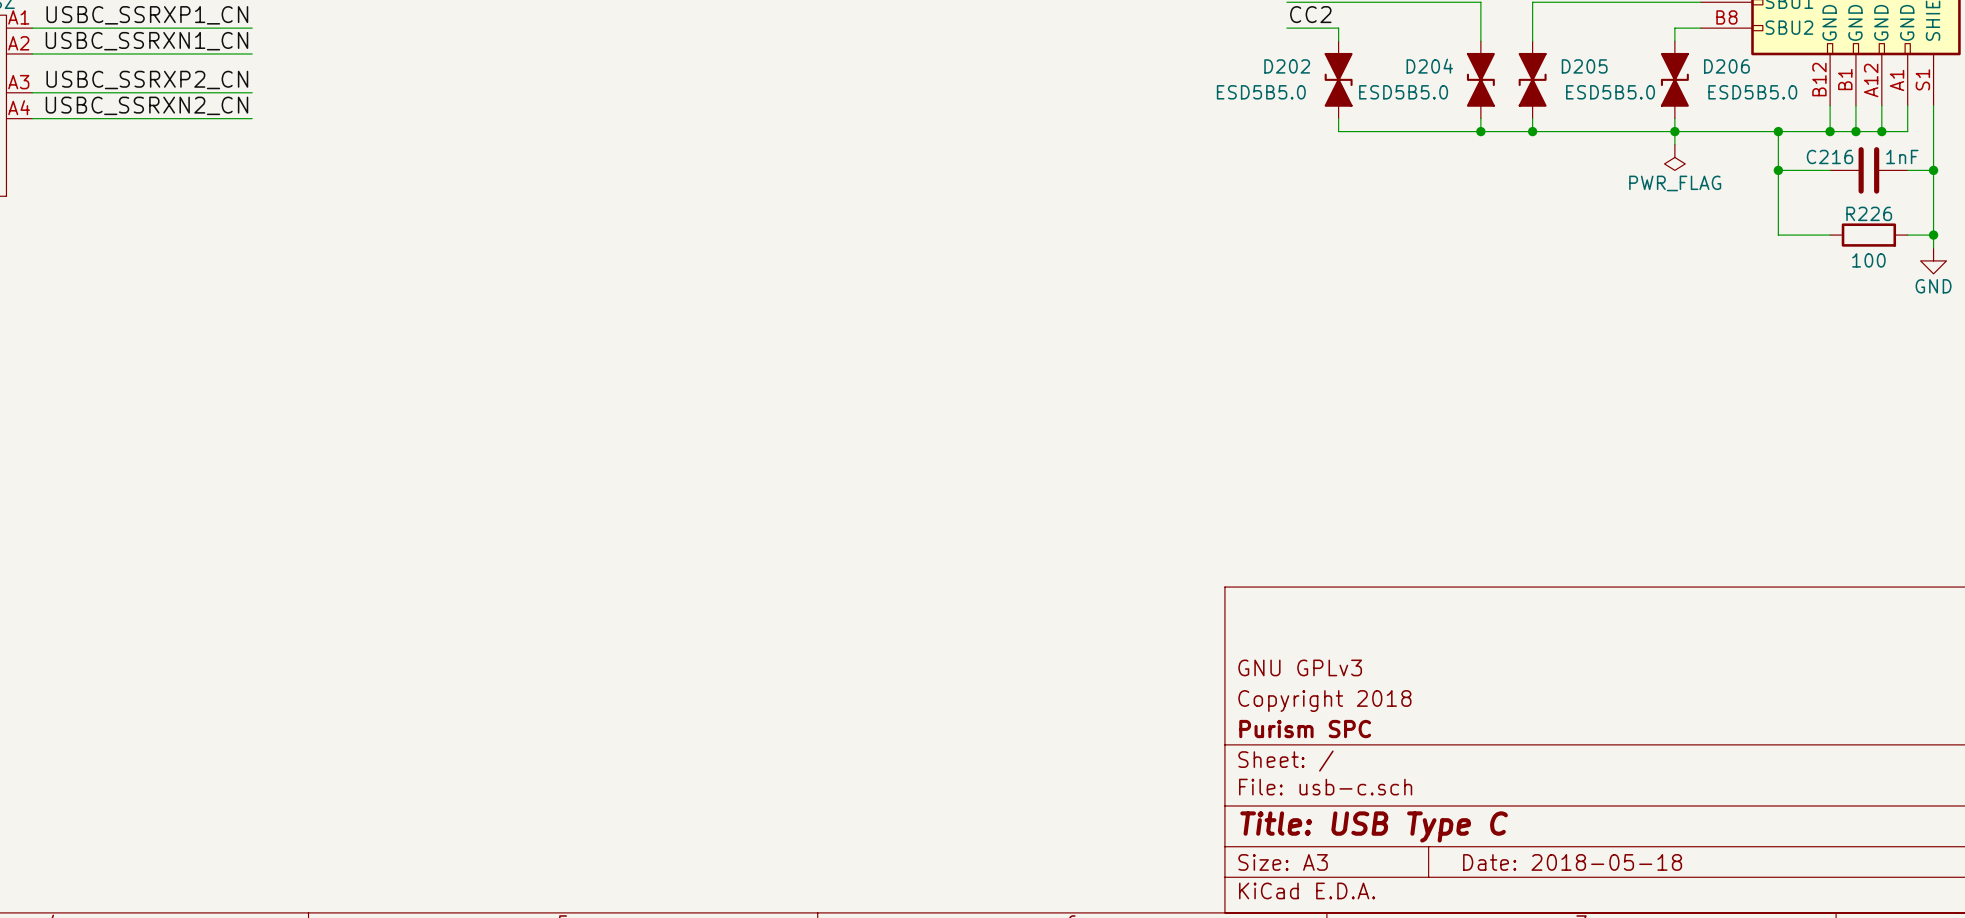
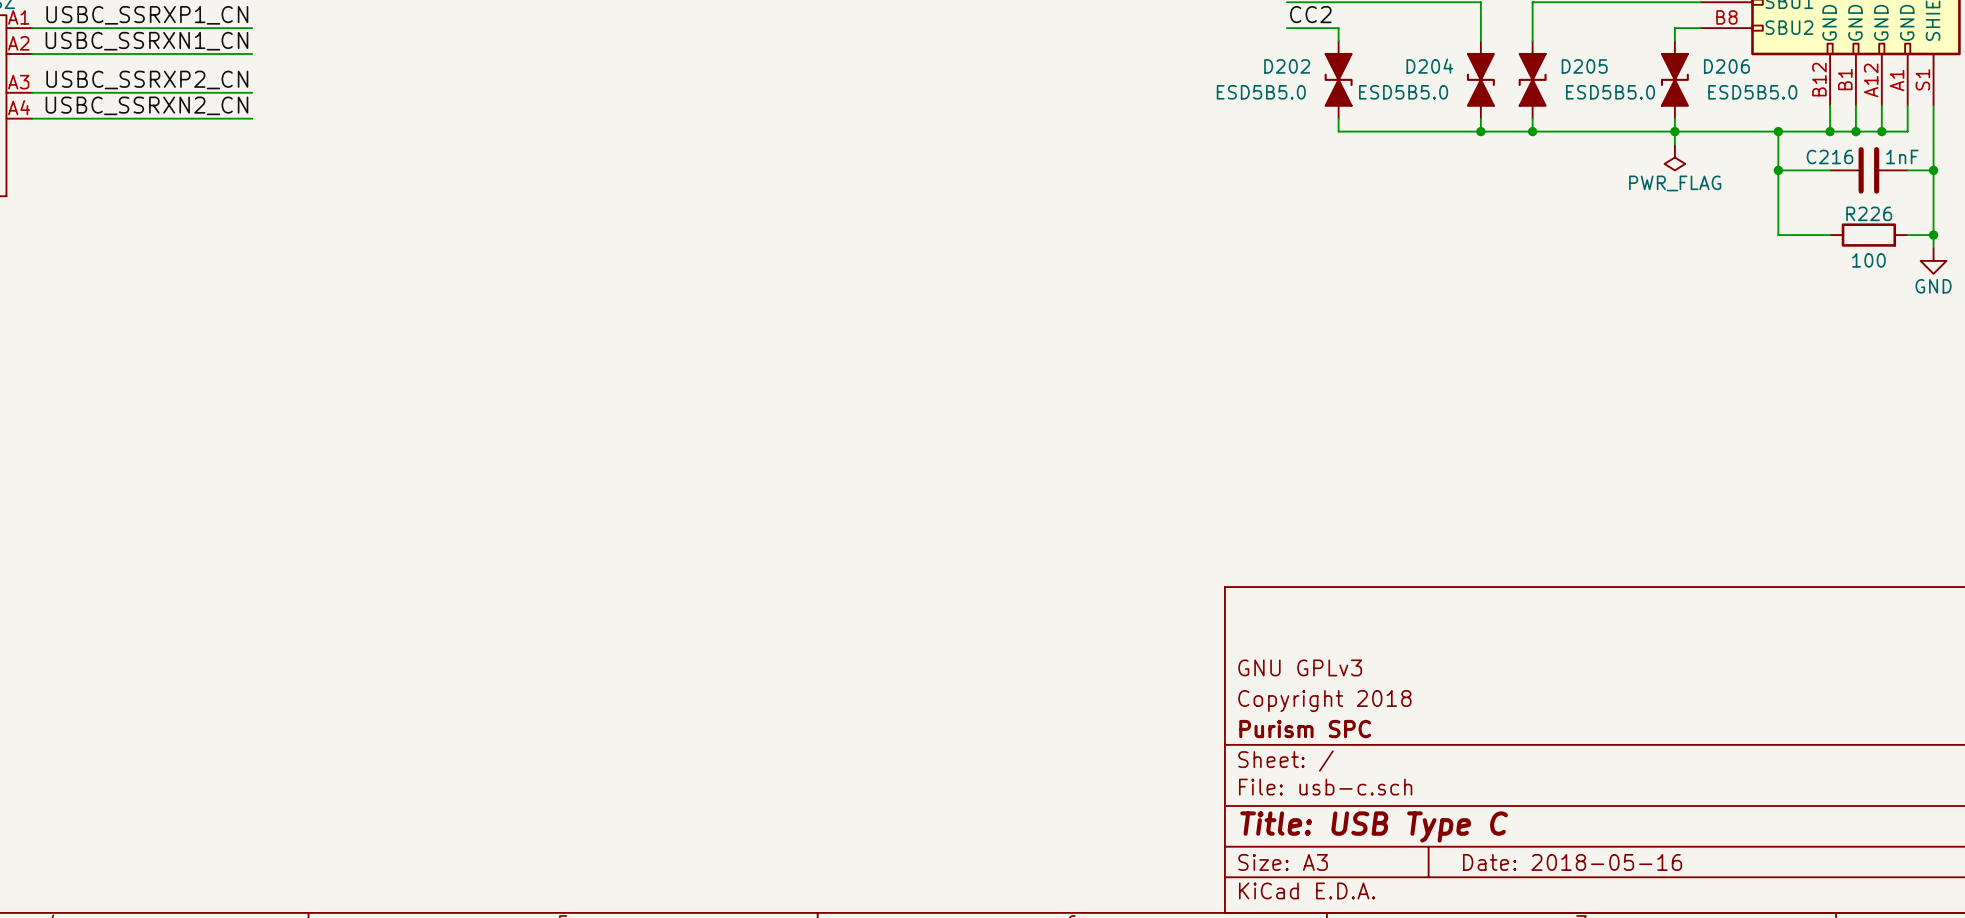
title block: Date: 2018-05-18 (1572, 862) -> Date: 2018-05-16 (1572, 862)

